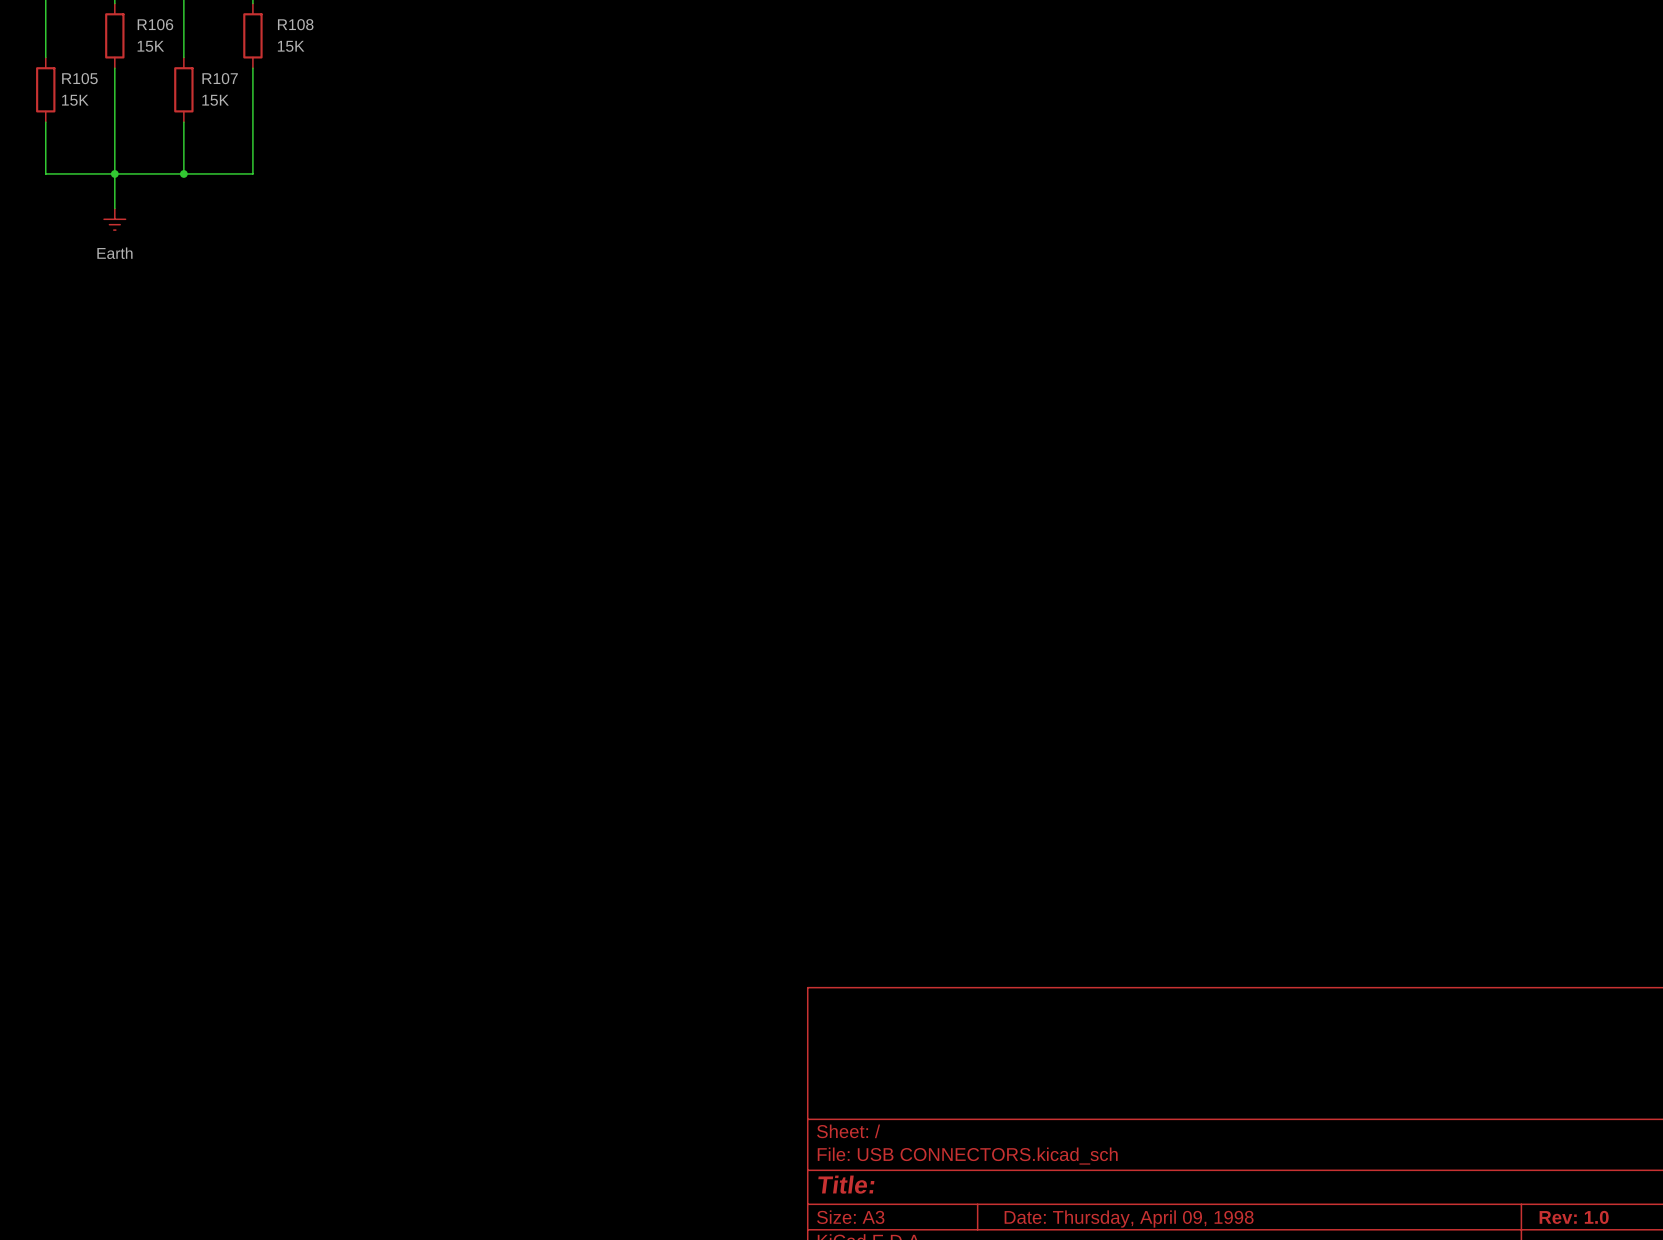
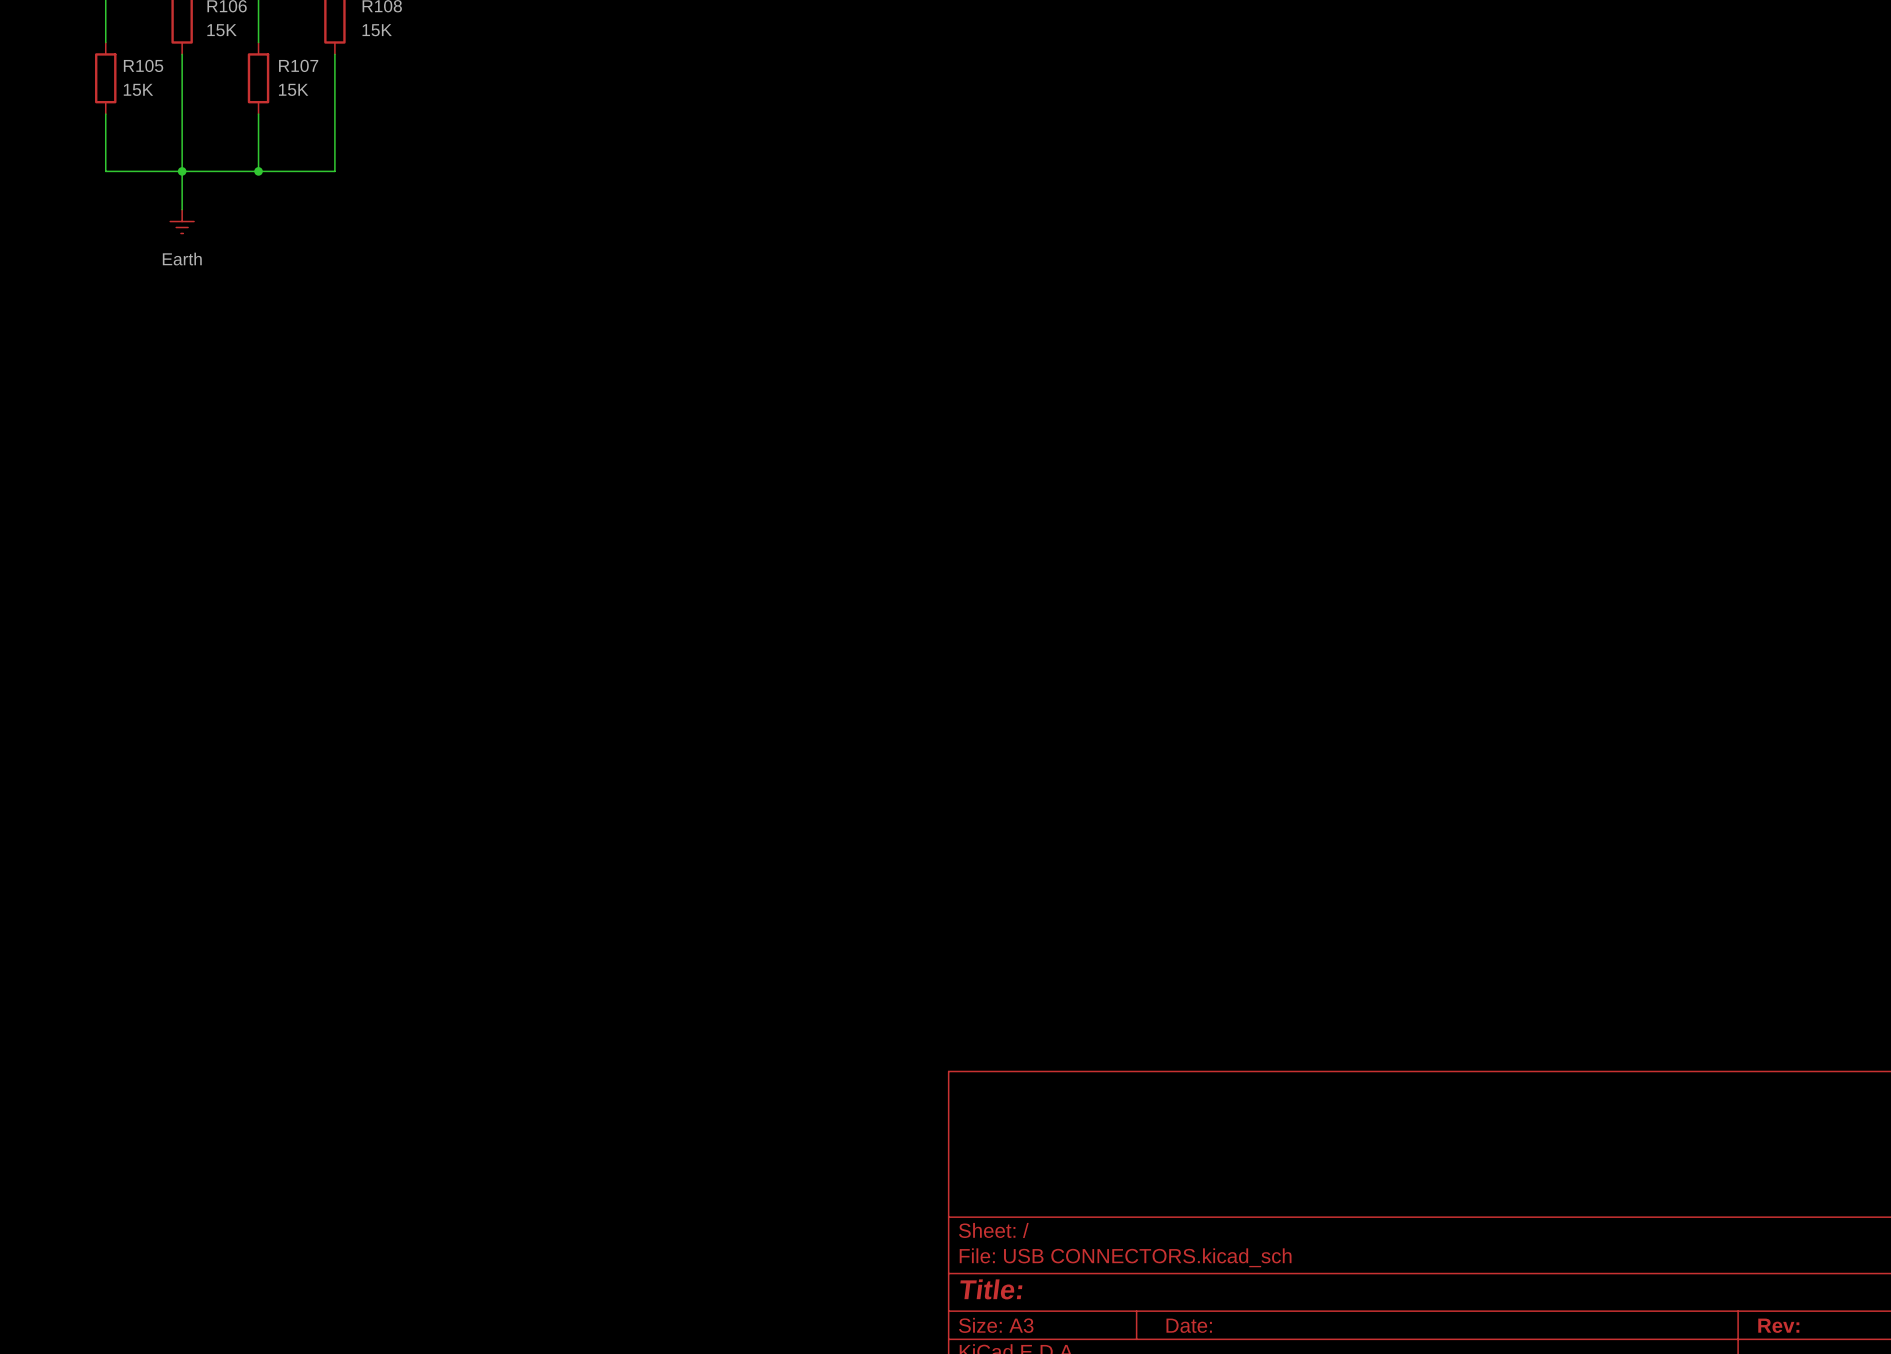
title block: Rev: 1.0 (1574, 1217) -> Rev: (1778, 1325)
title block: Date: Thursday, April 09, 1998 (1129, 1219) -> Date: (1189, 1325)

